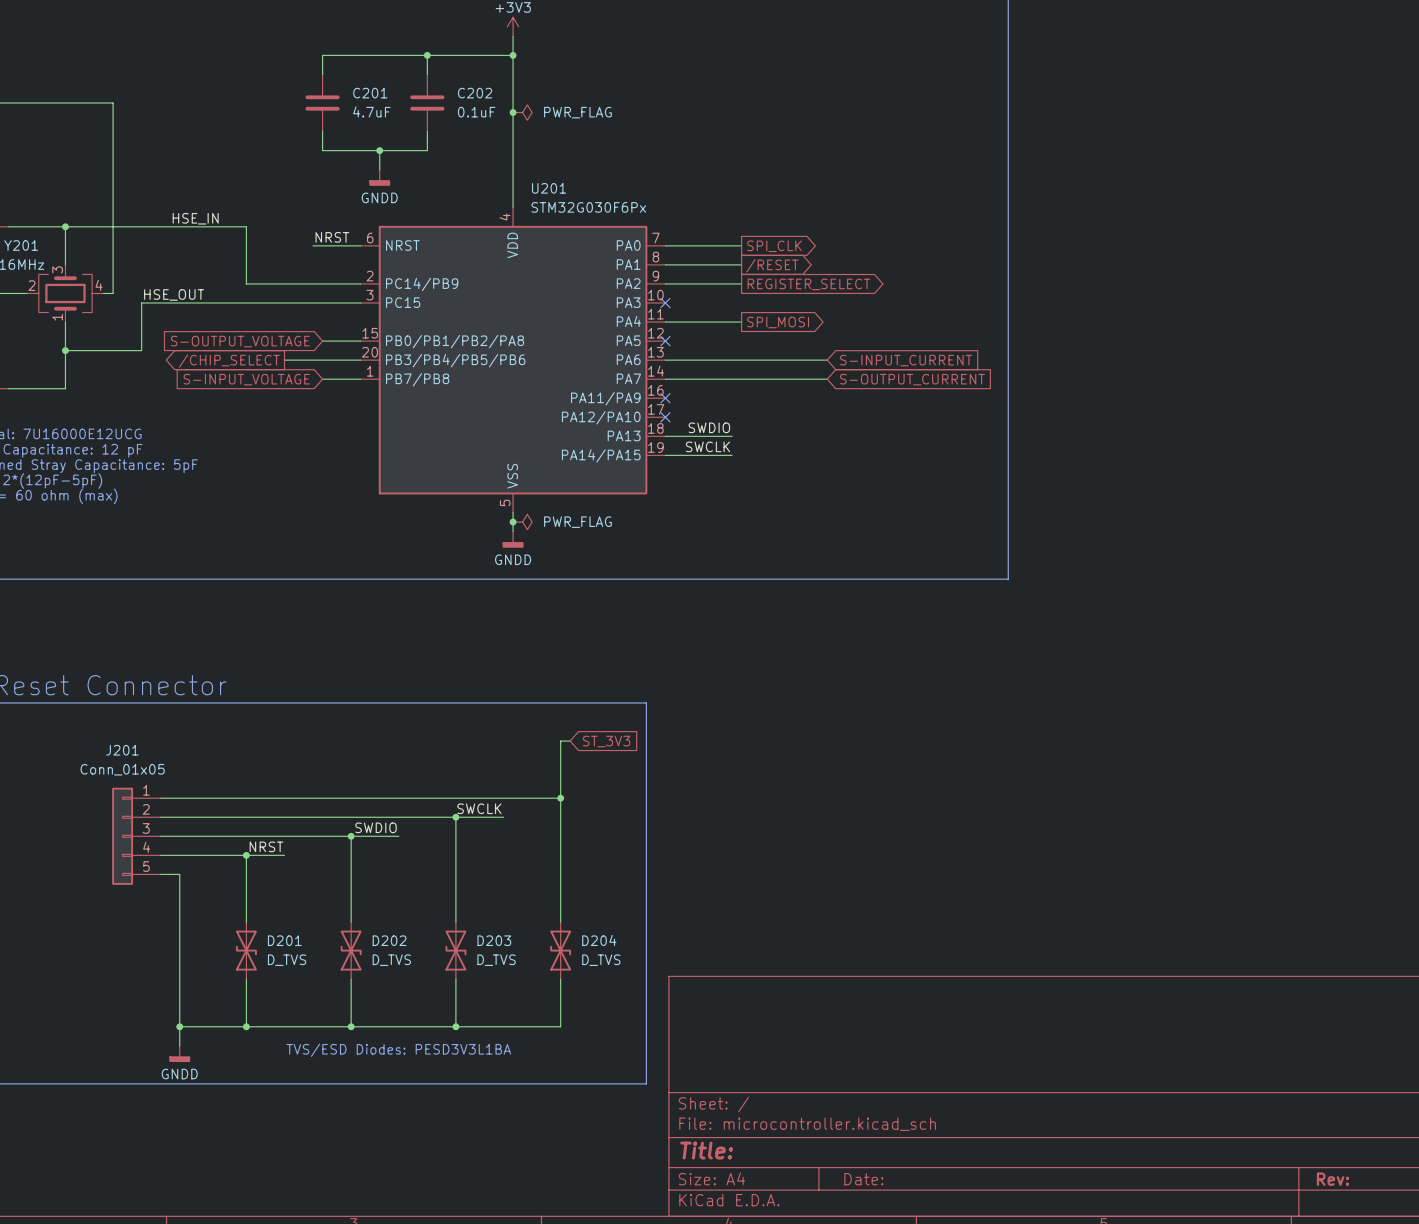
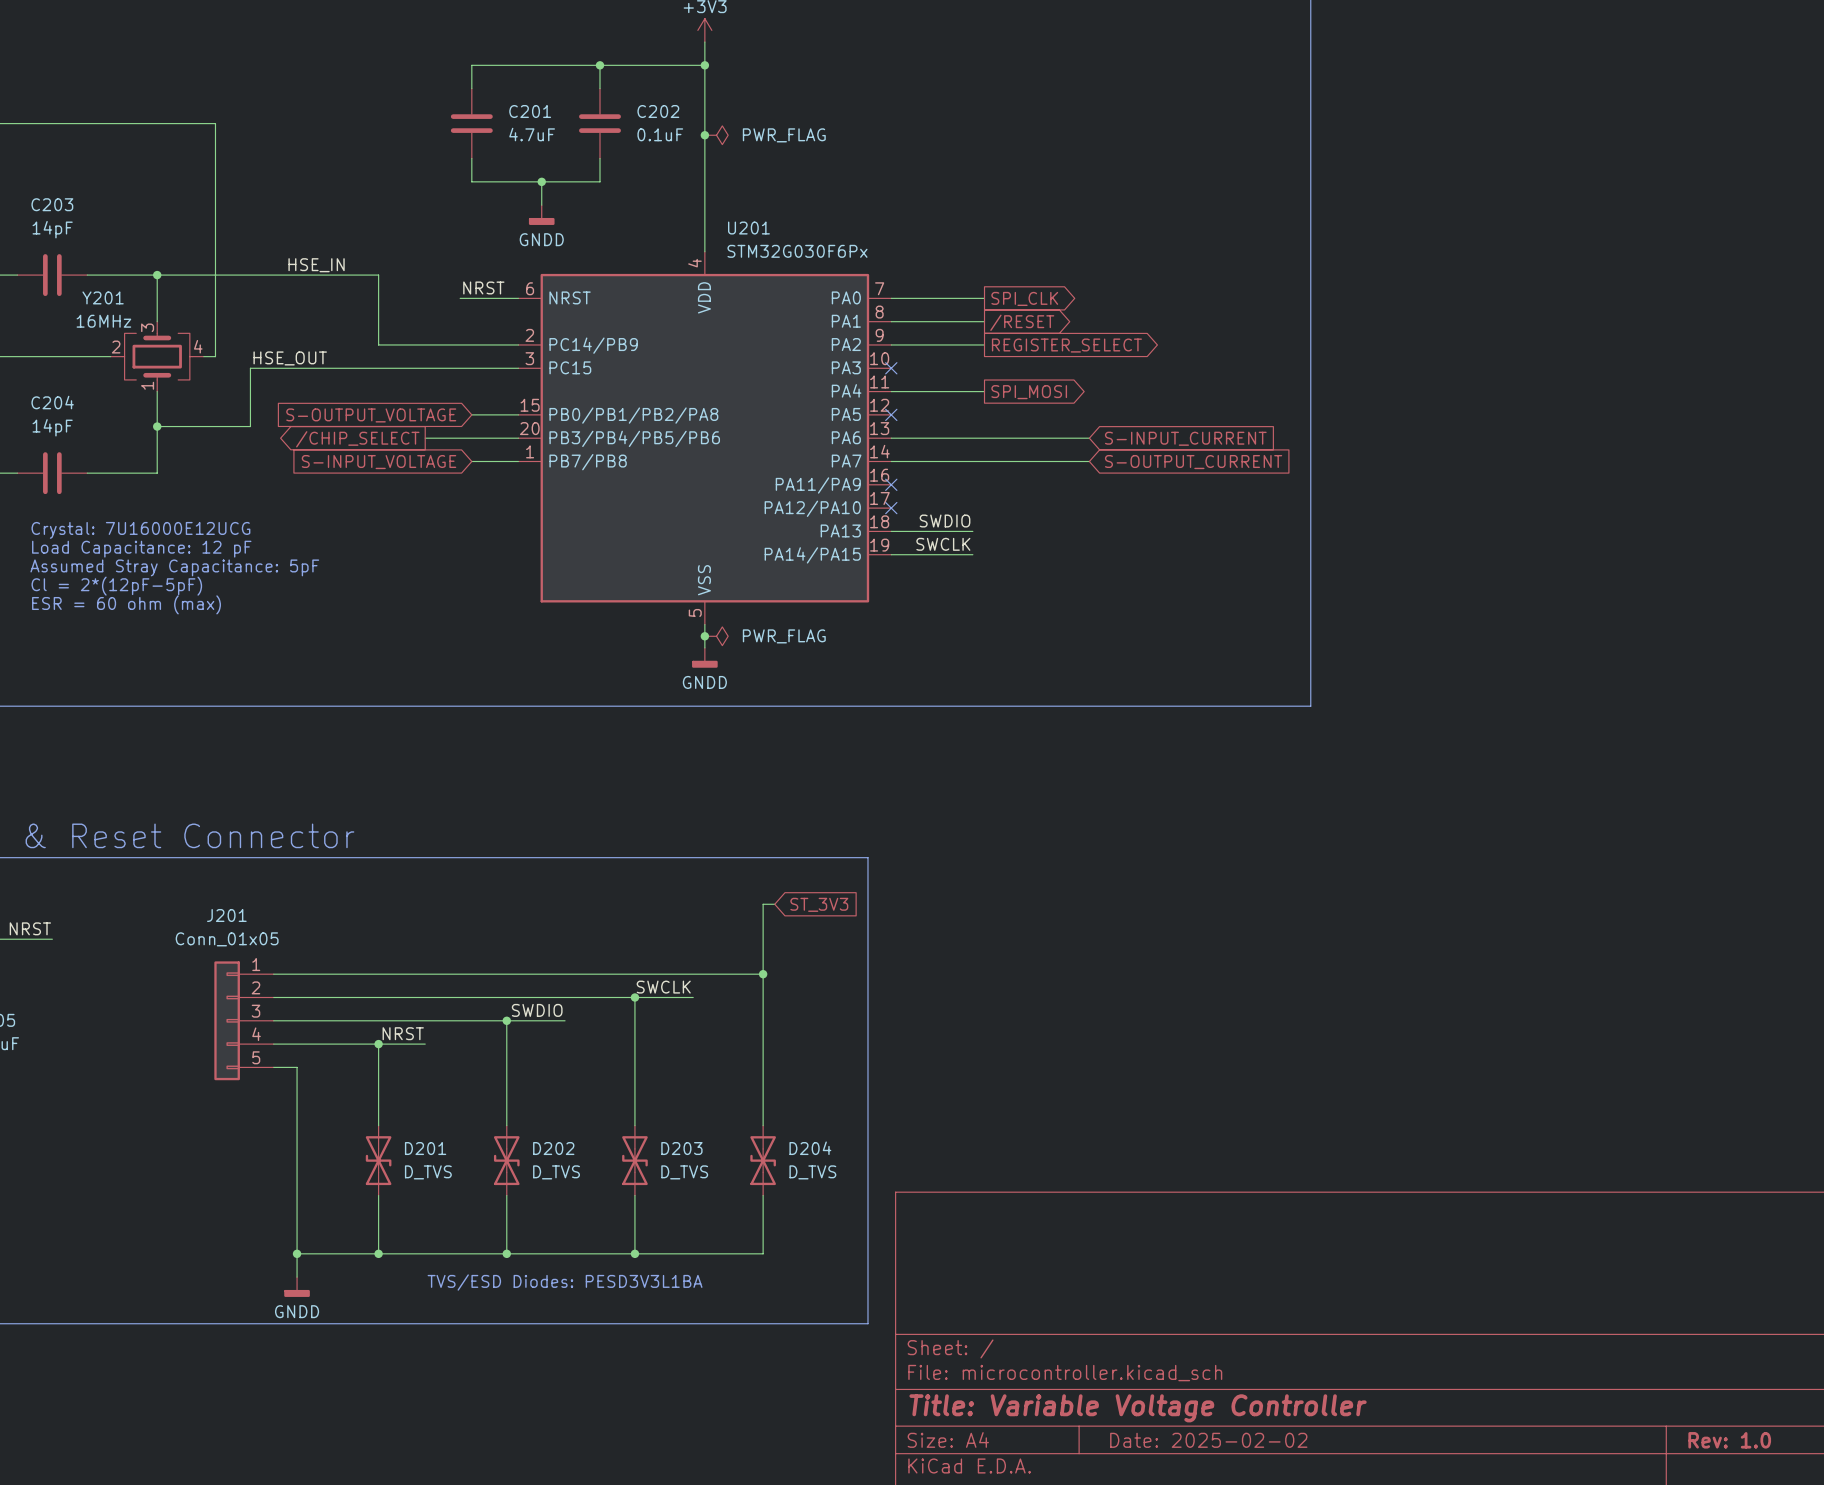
title block: Title: (706, 1150) -> Title: Variable Voltage Controller (1138, 1408)
title block: Date: (863, 1179) -> Date: 2025-02-02 (1208, 1440)
title block: Rev: (1332, 1179) -> Rev: 1.0 (1729, 1440)

